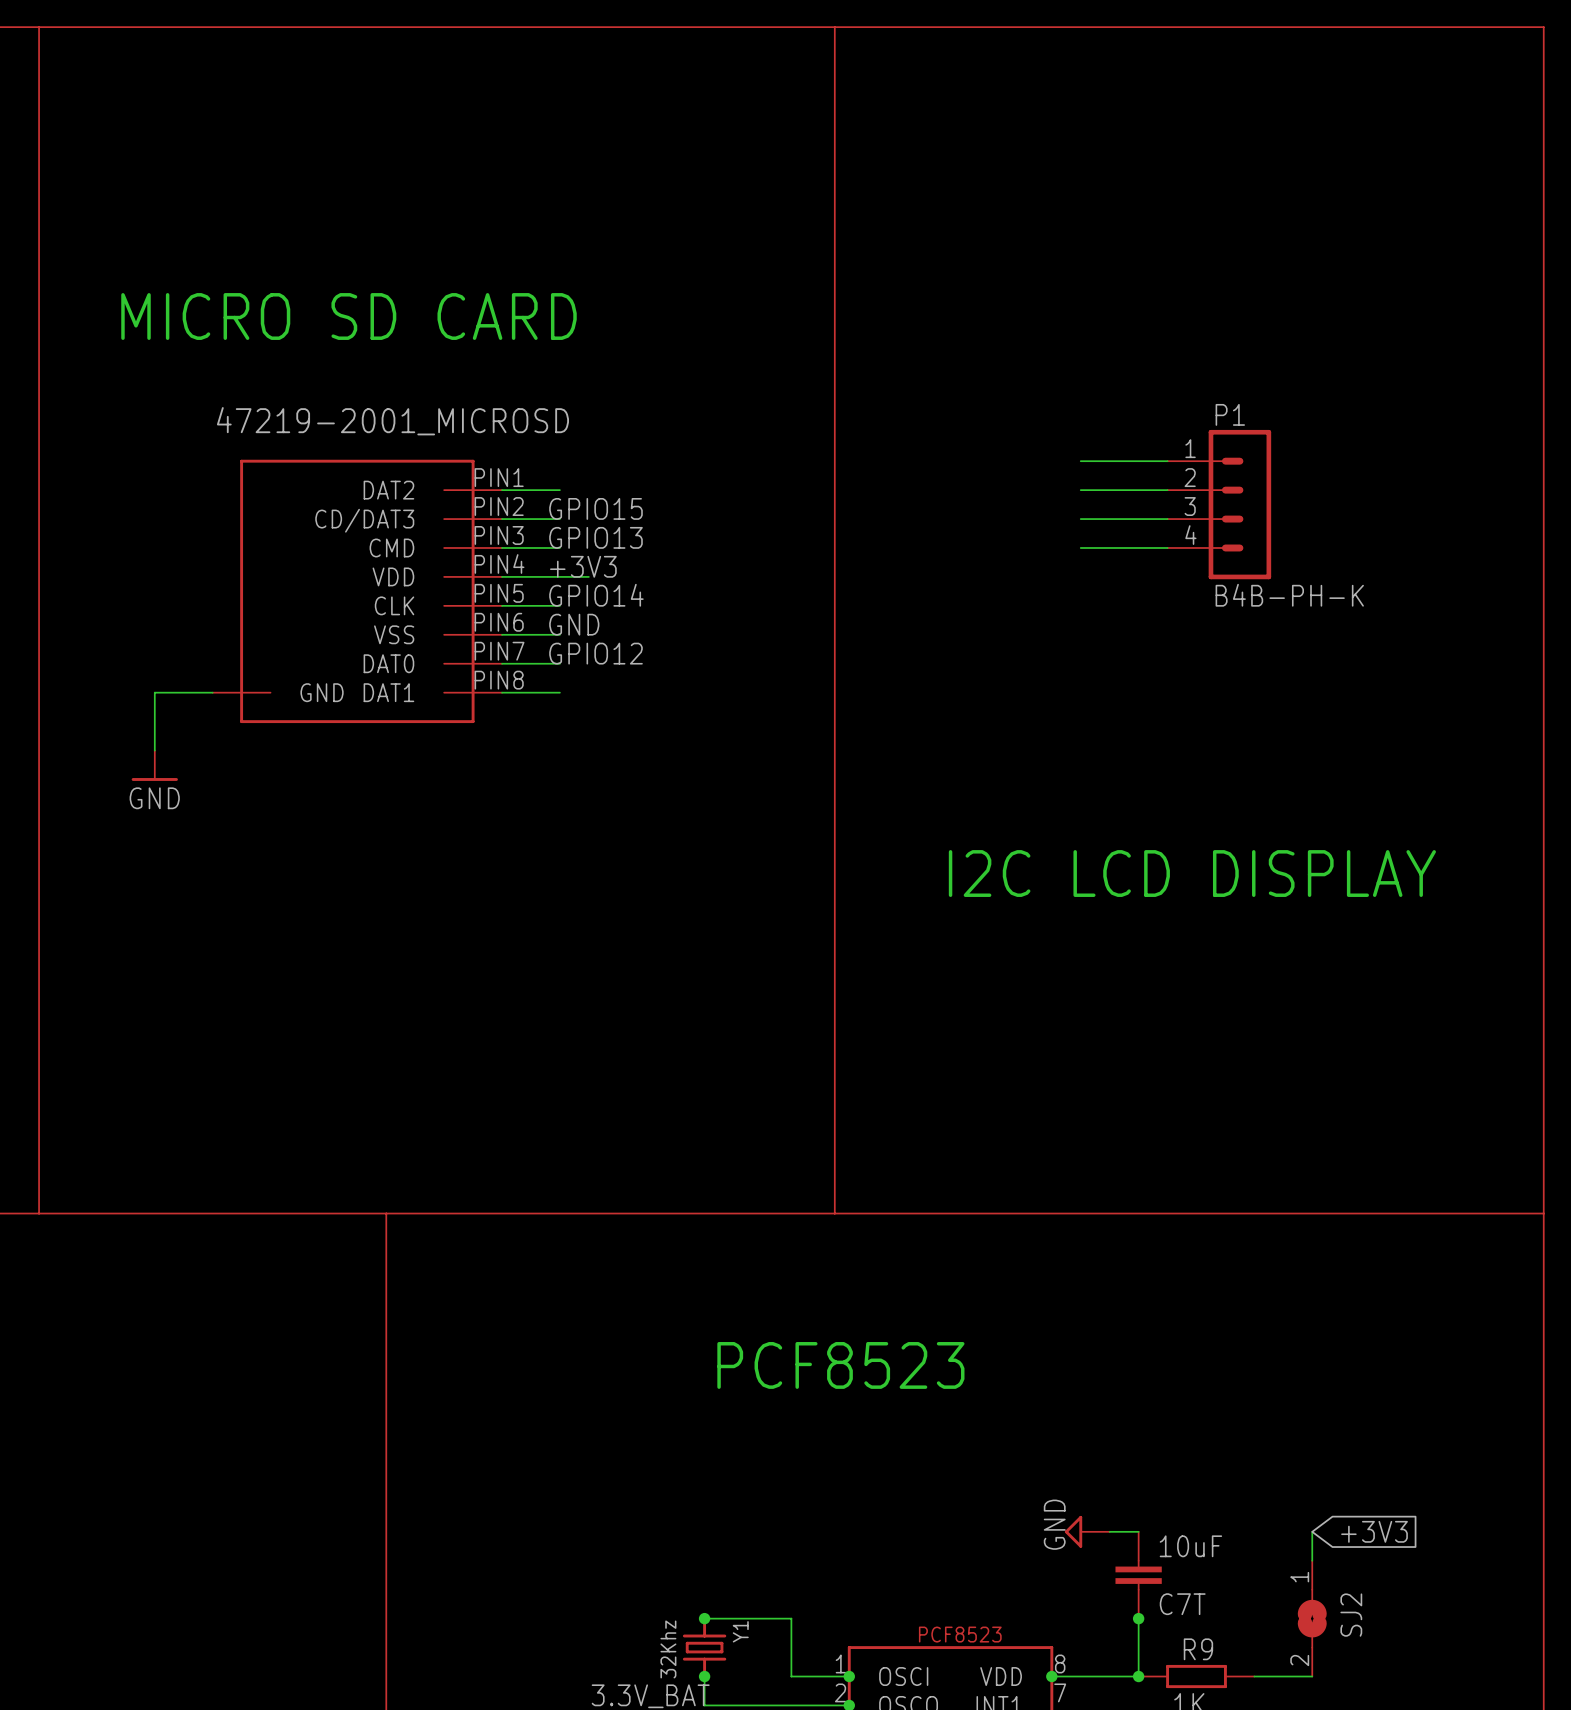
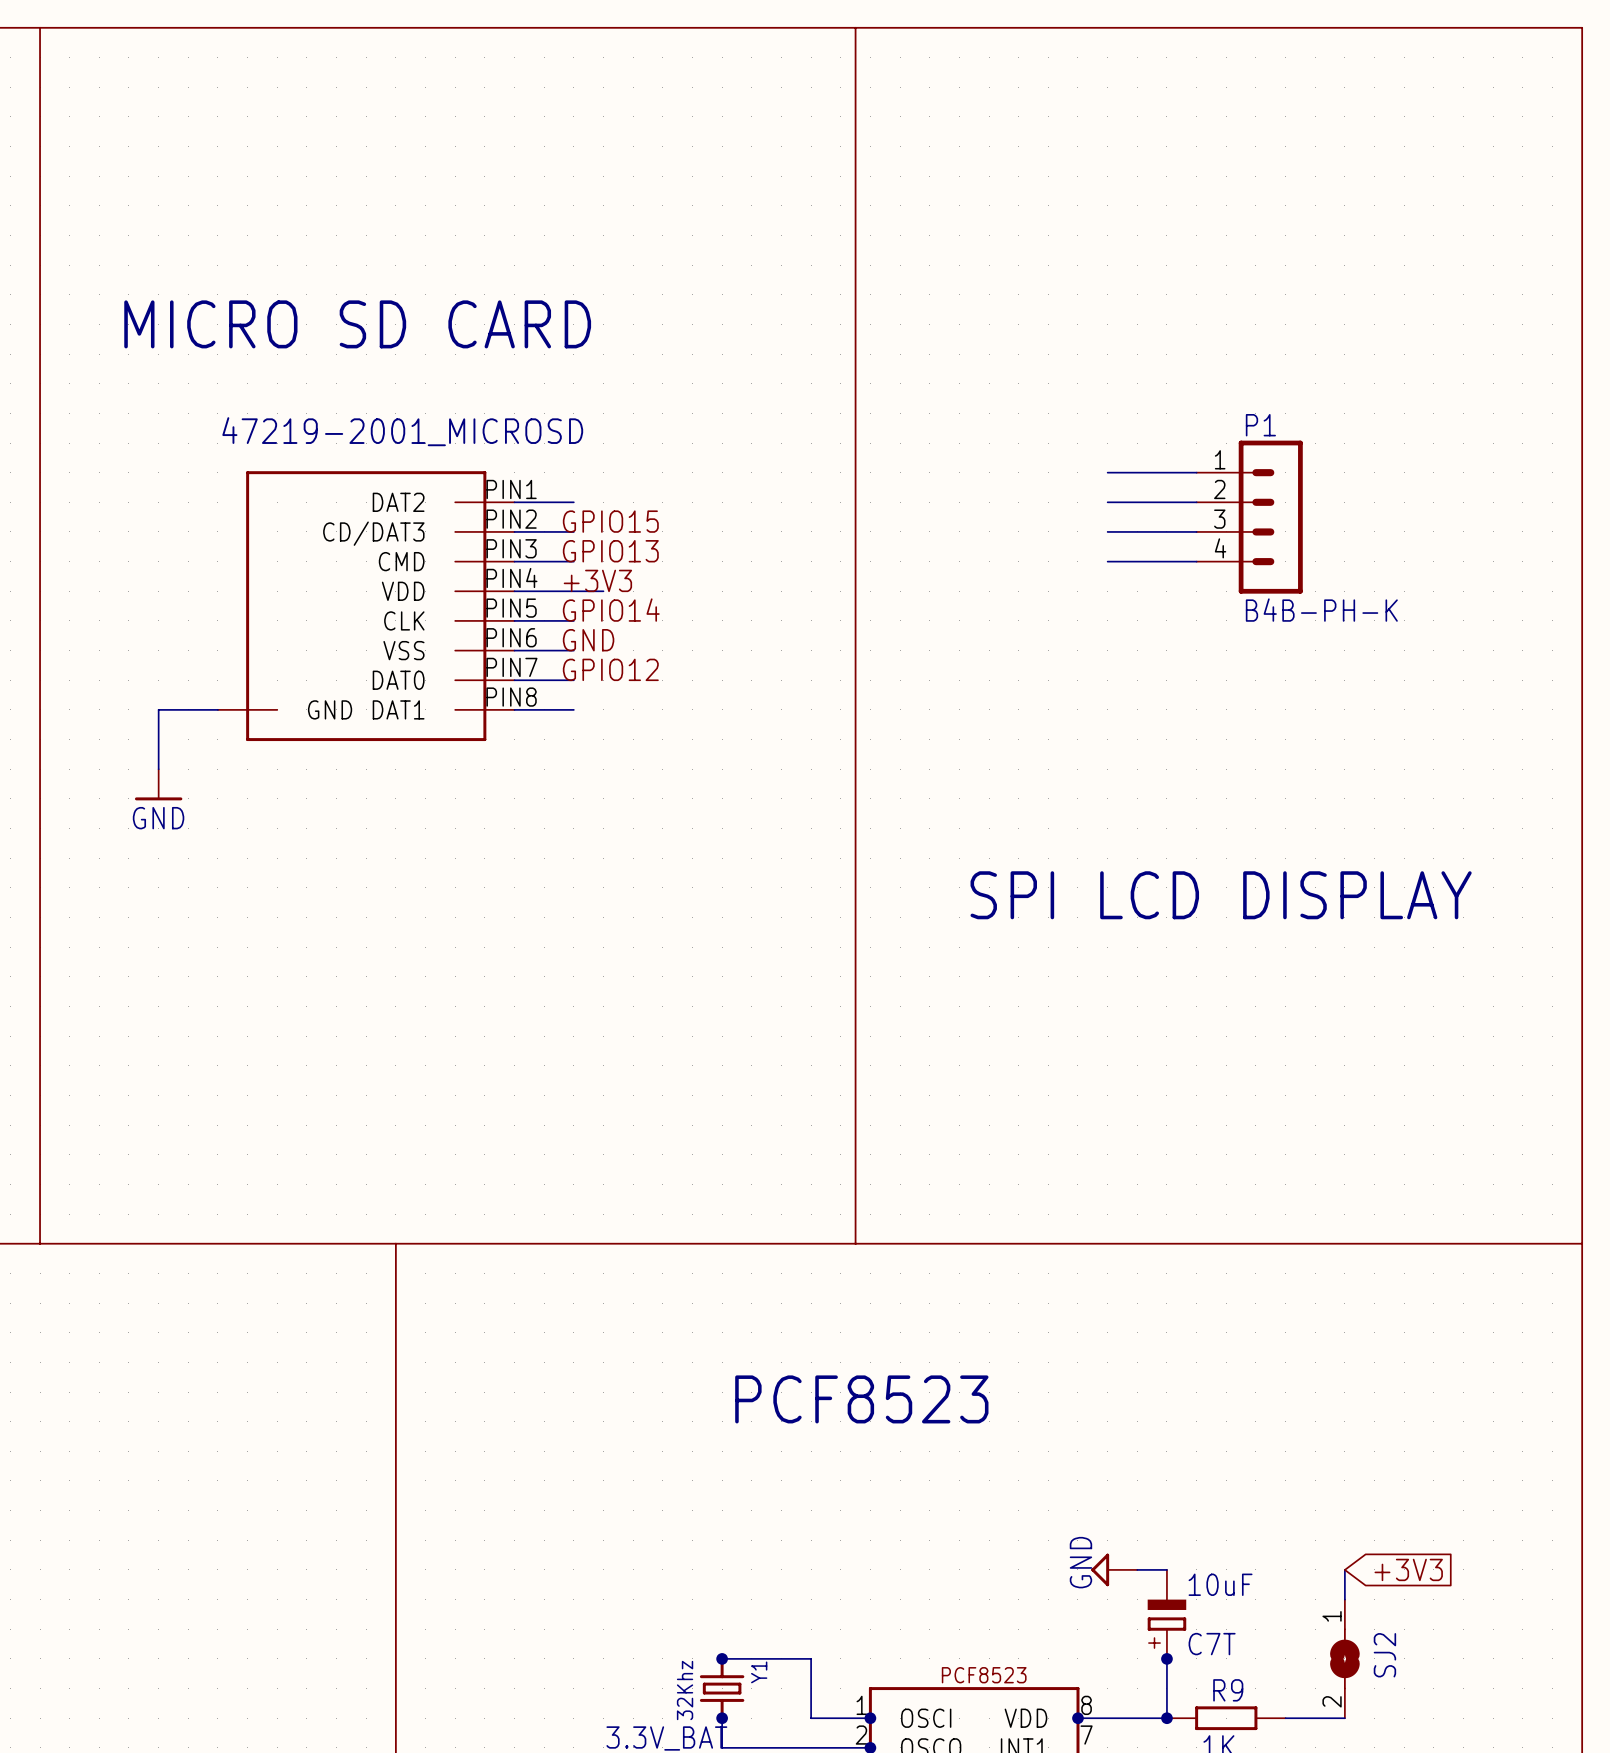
text: I2C LCD DISPLAY (1192, 873) -> SPI LCD DISPLAY (1221, 895)
C7T symbol: [1115, 1531, 1162, 1619] -> [1147, 1569, 1187, 1659]

